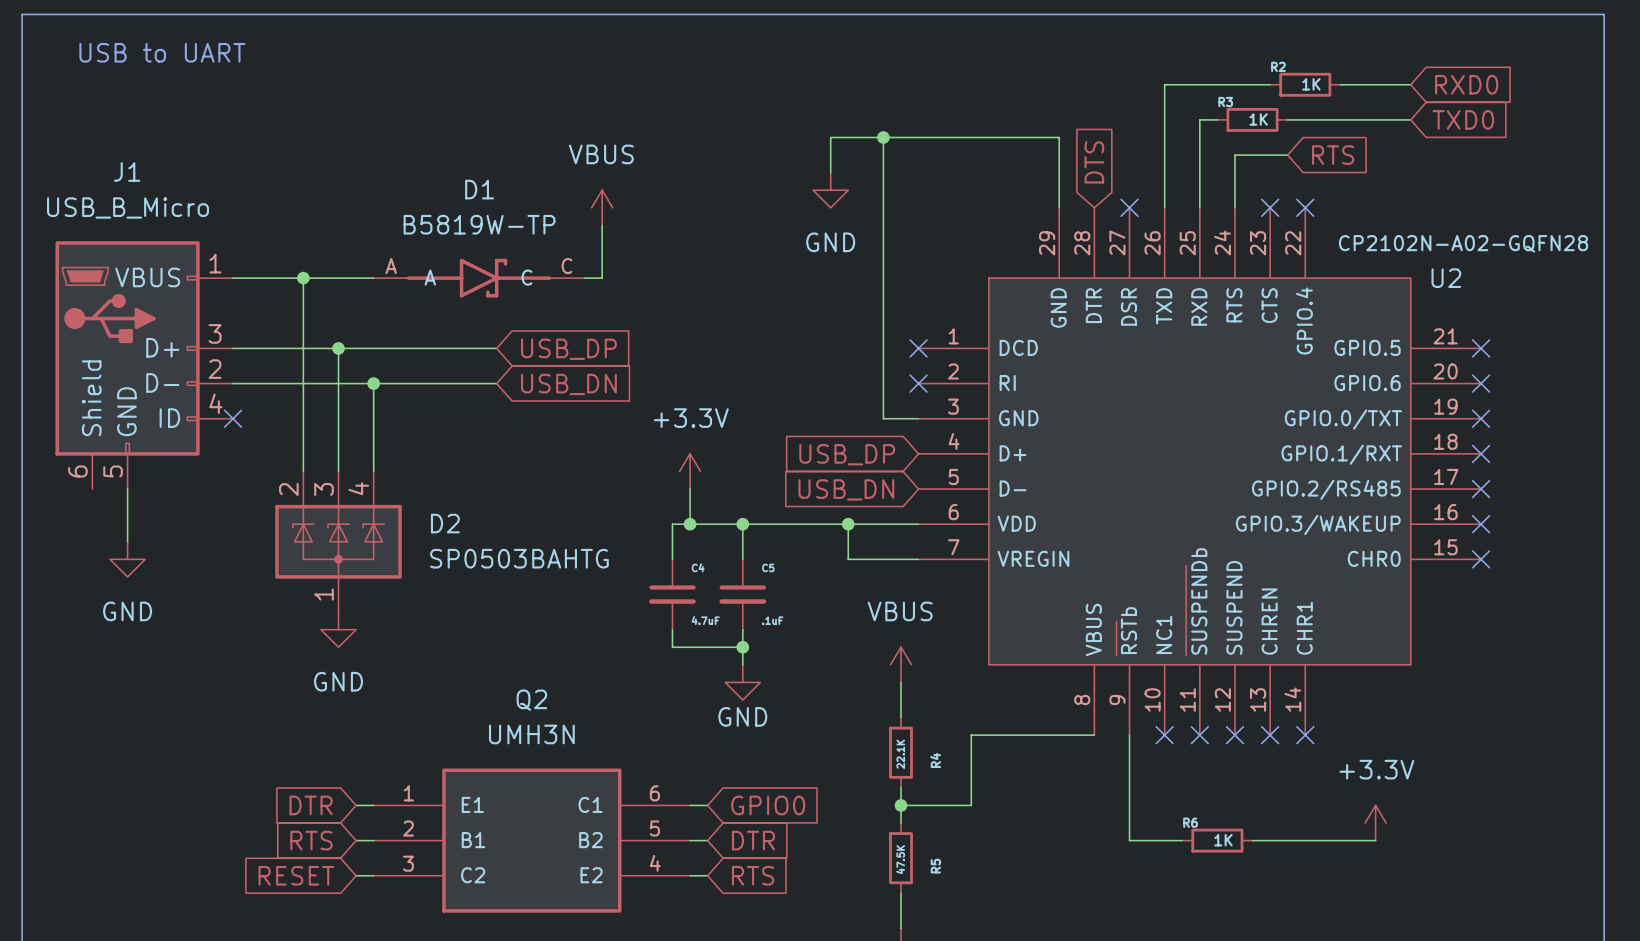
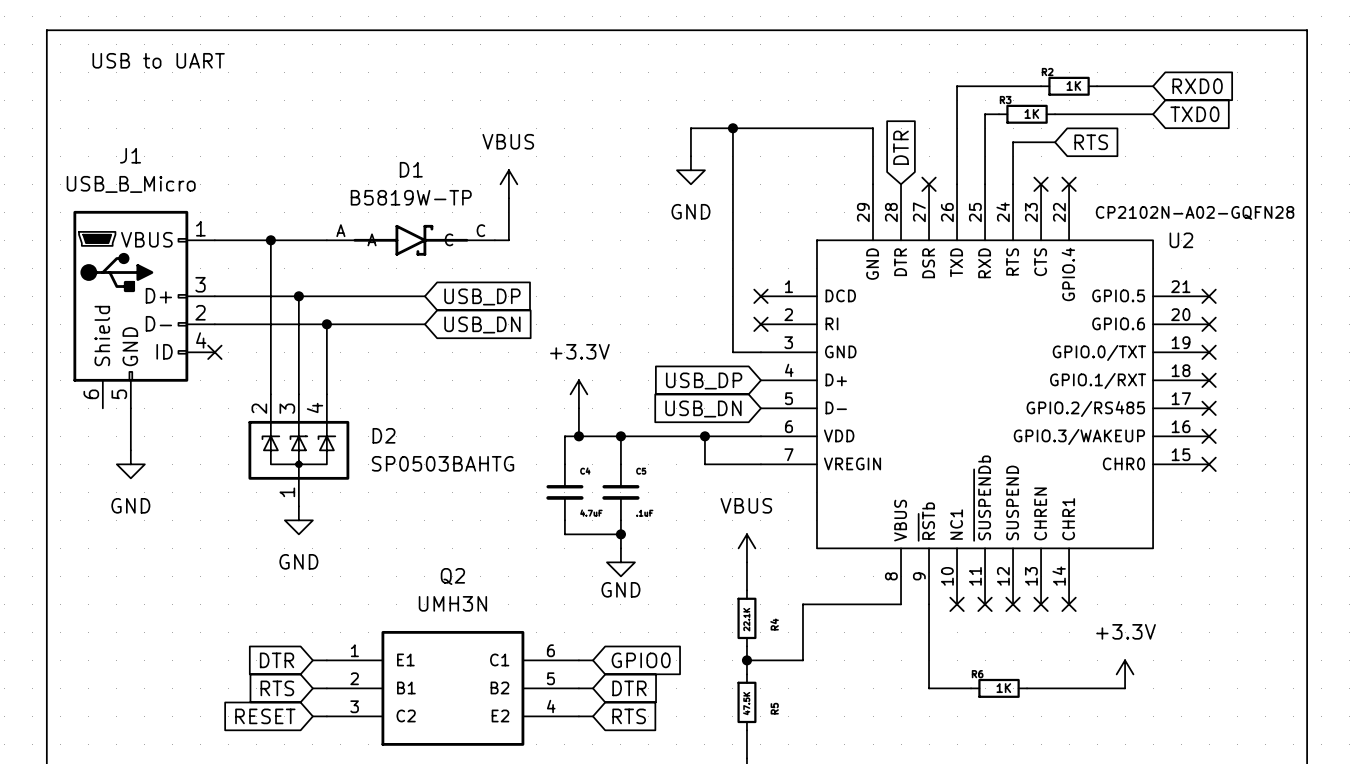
global label: DTS (1094, 162) -> DTR (901, 147)

